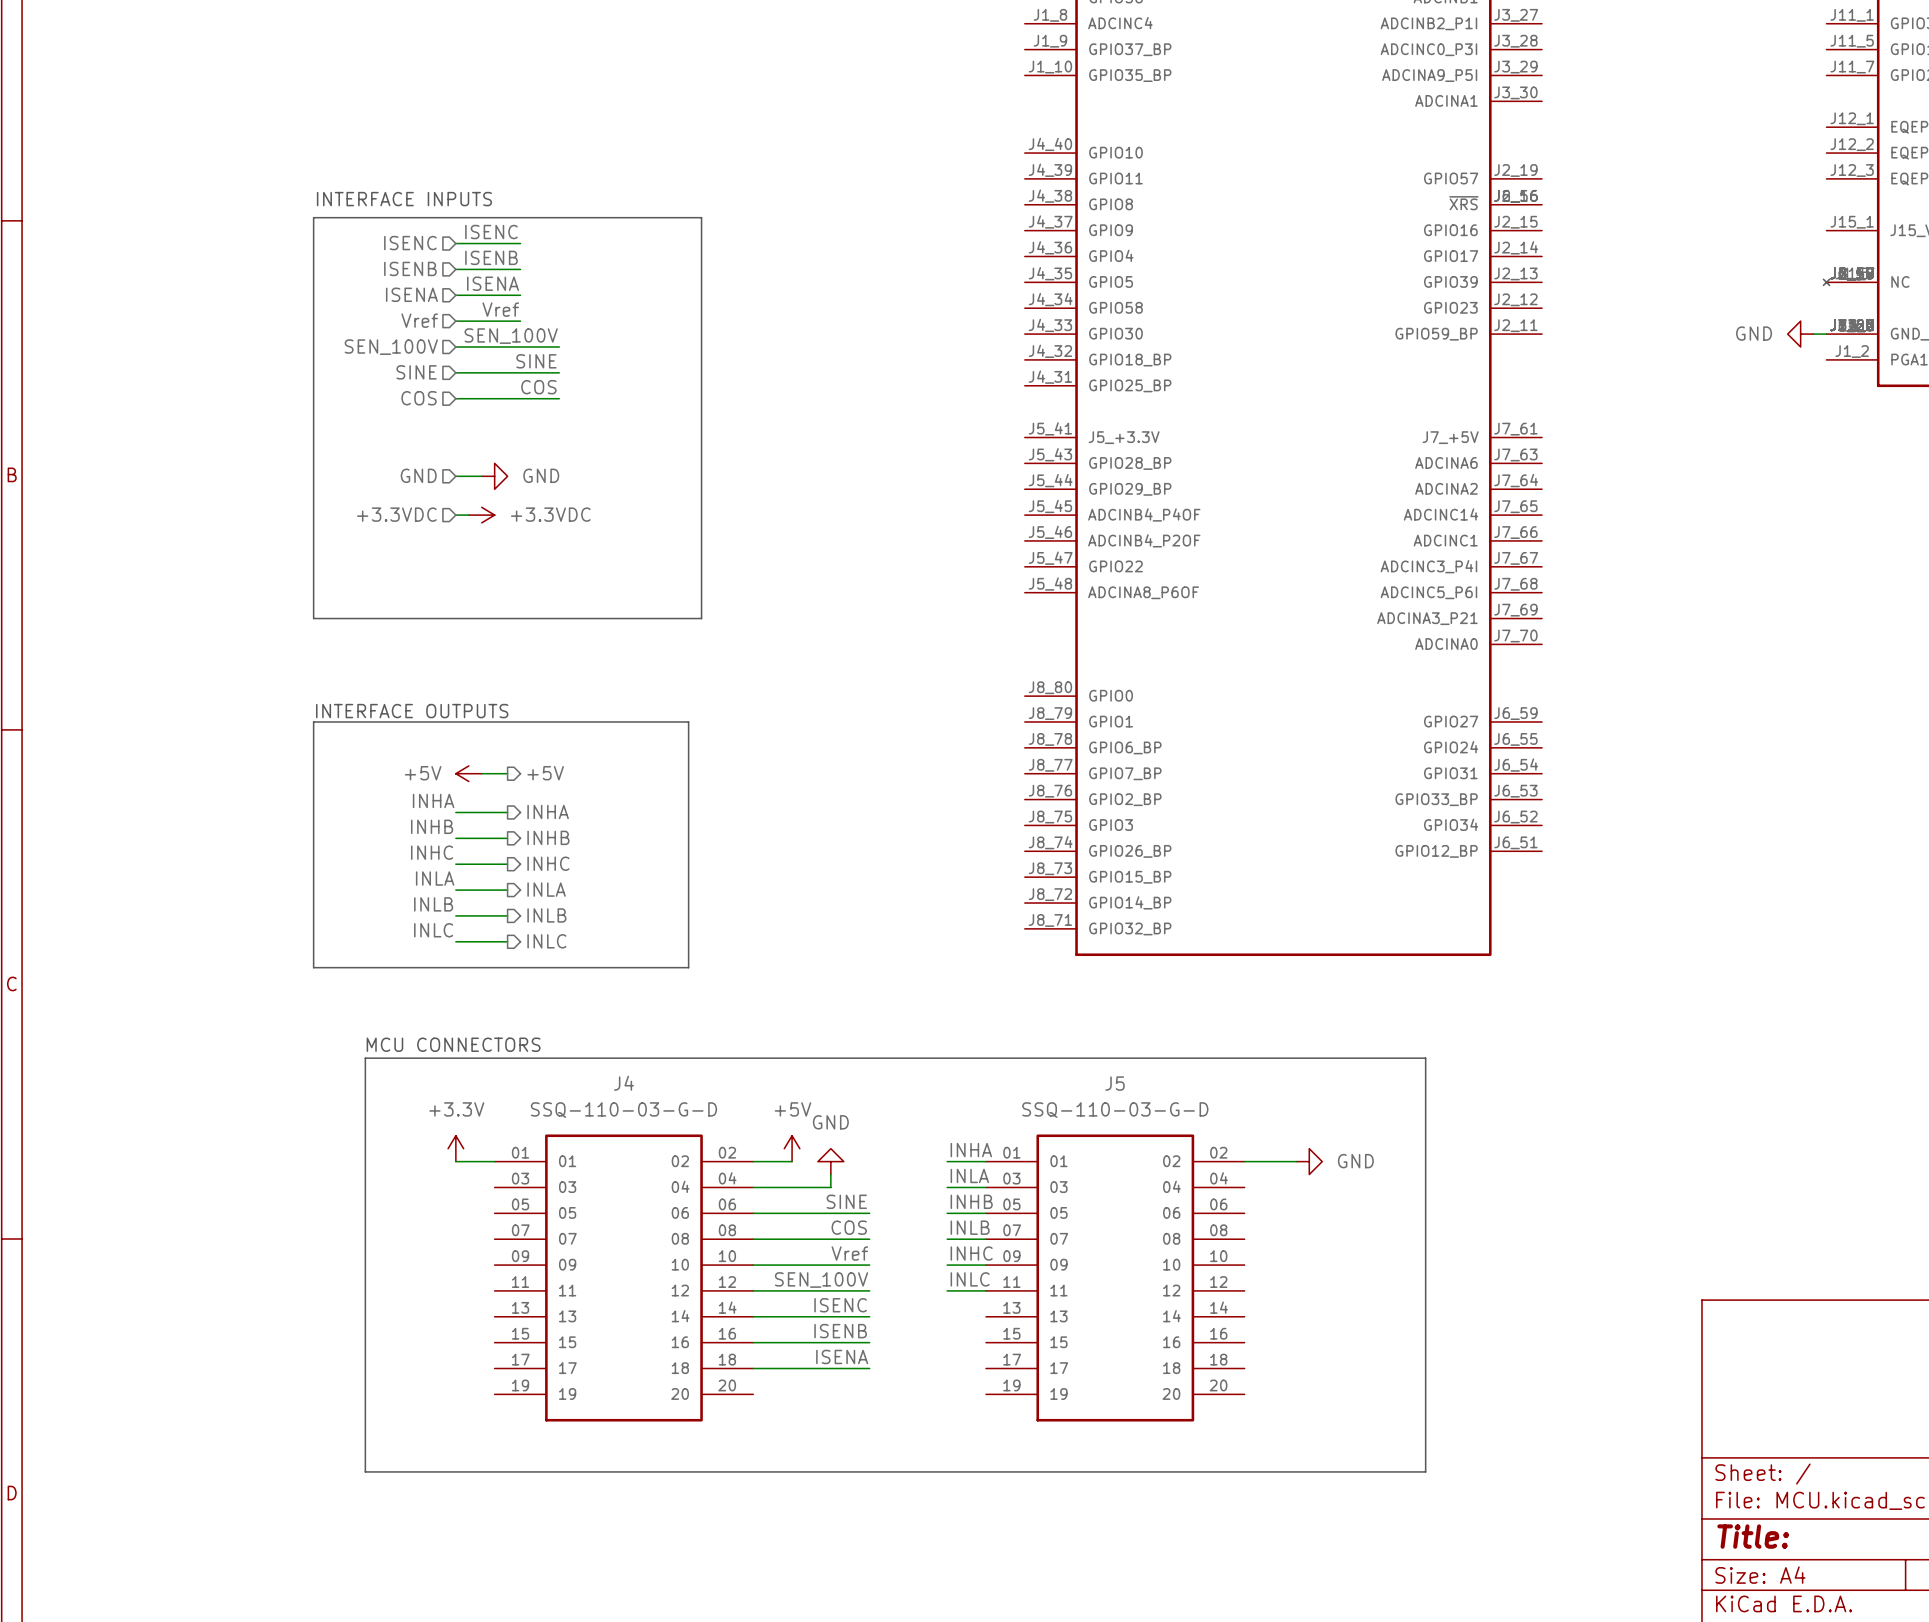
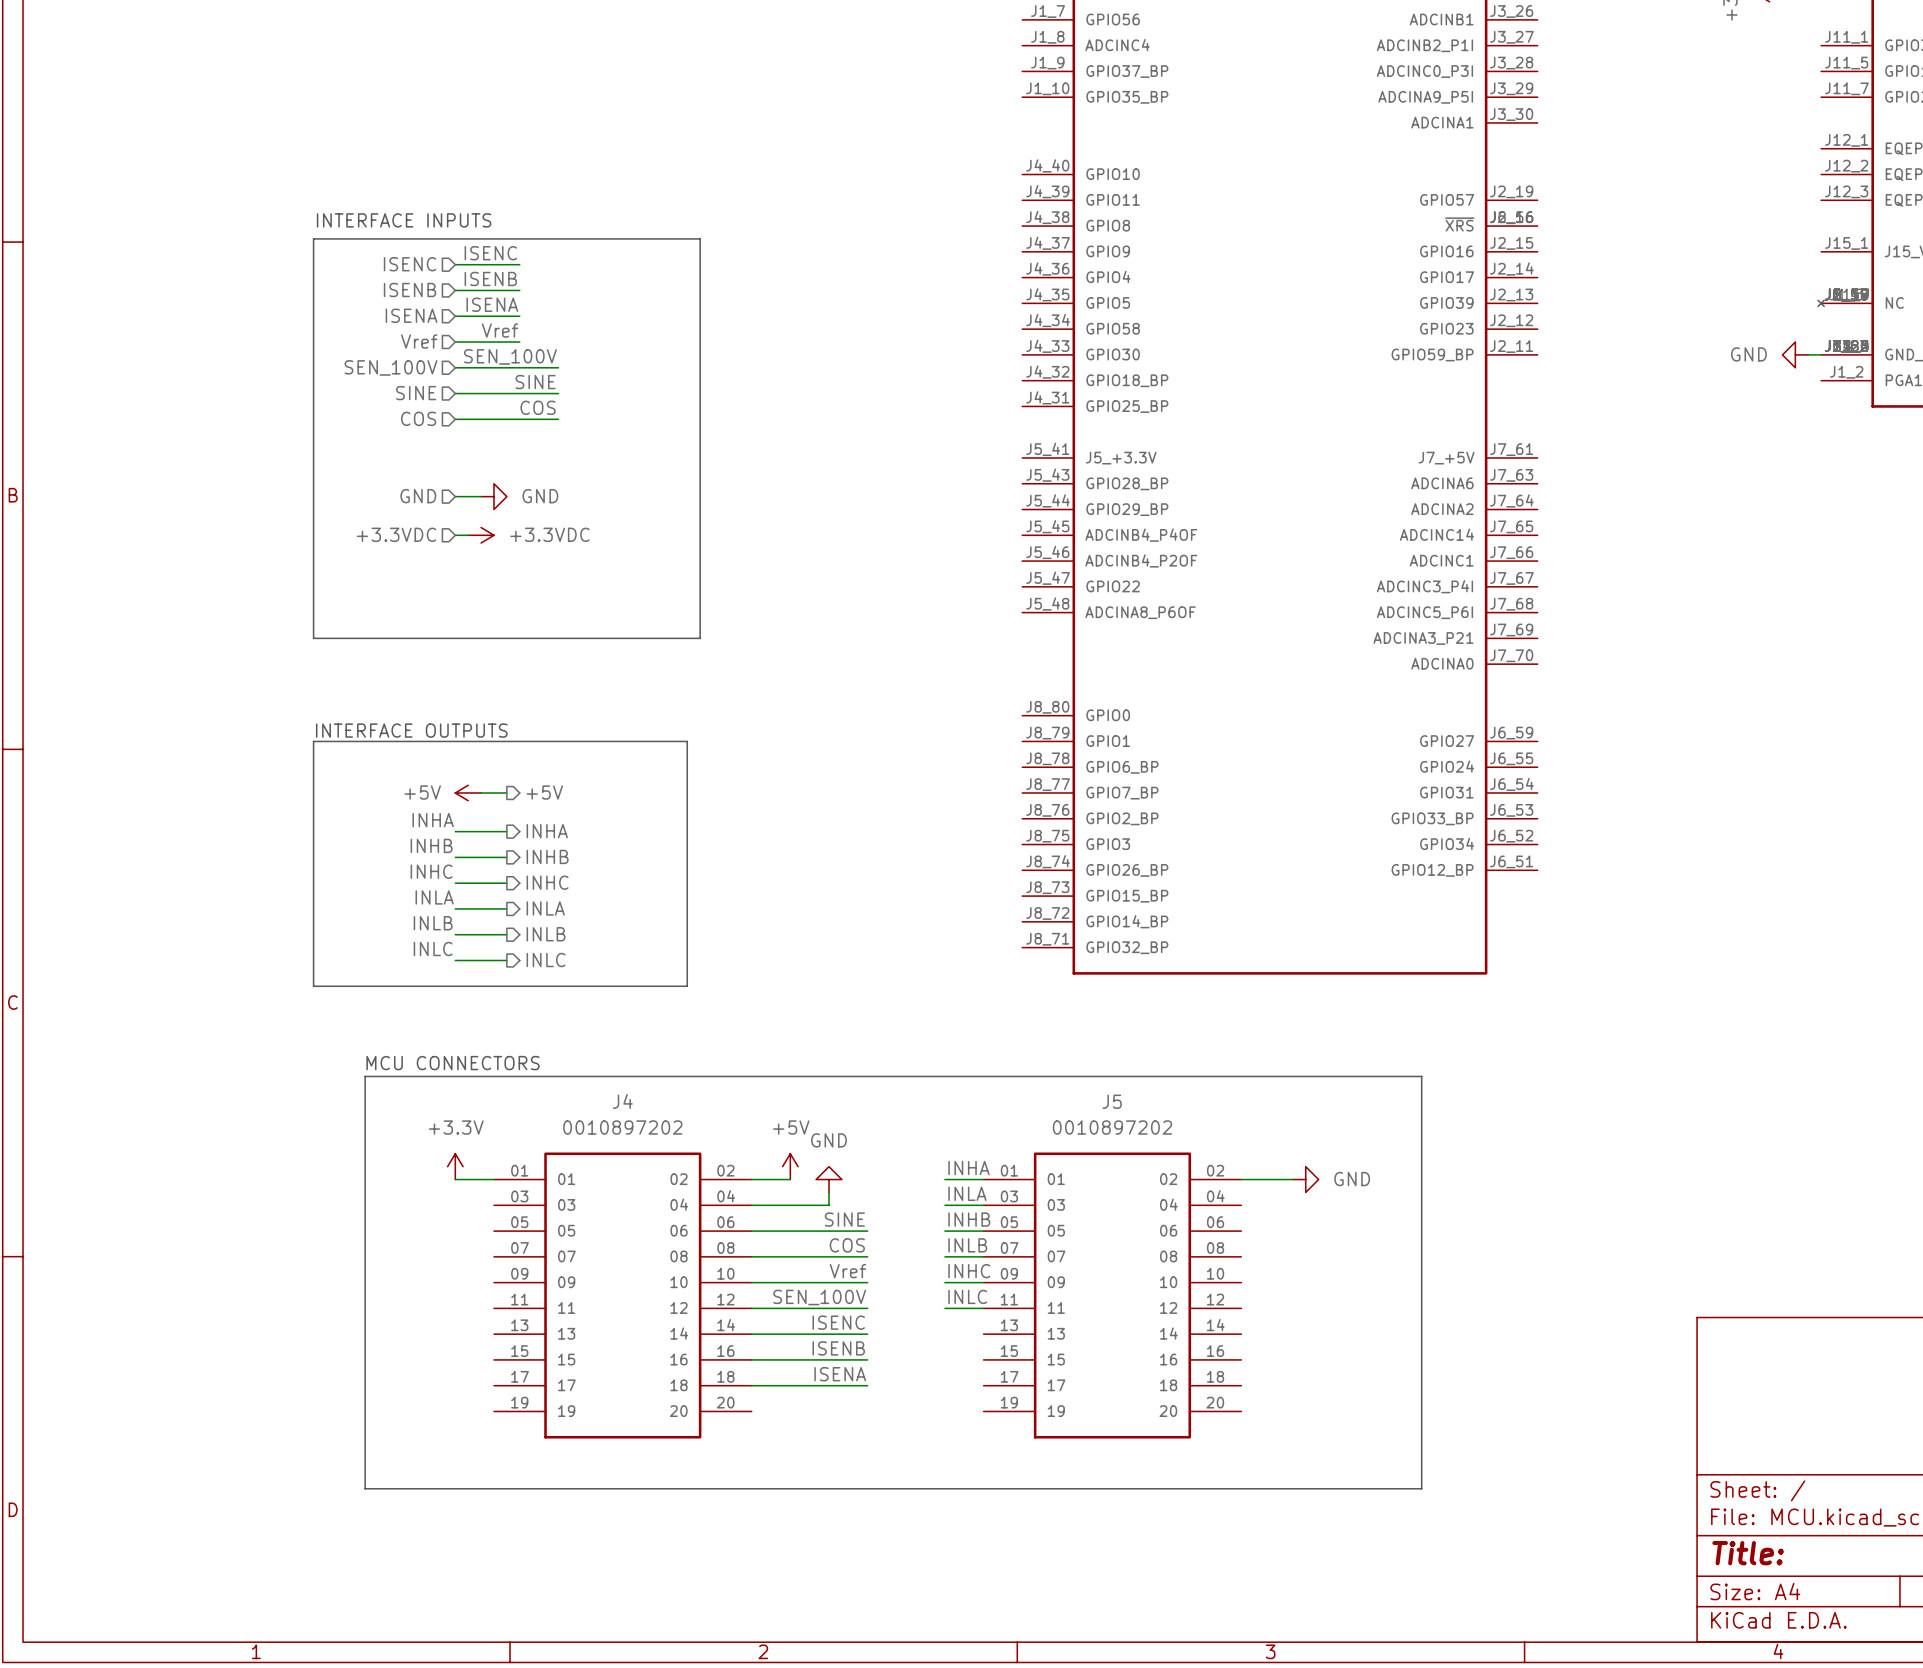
J4 value: SSQ-110-03-G-D (623, 1110) -> 0010897202 (622, 1127)
J5 value: SSQ-110-03-G-D (1115, 1110) -> 0010897202 (1112, 1127)

